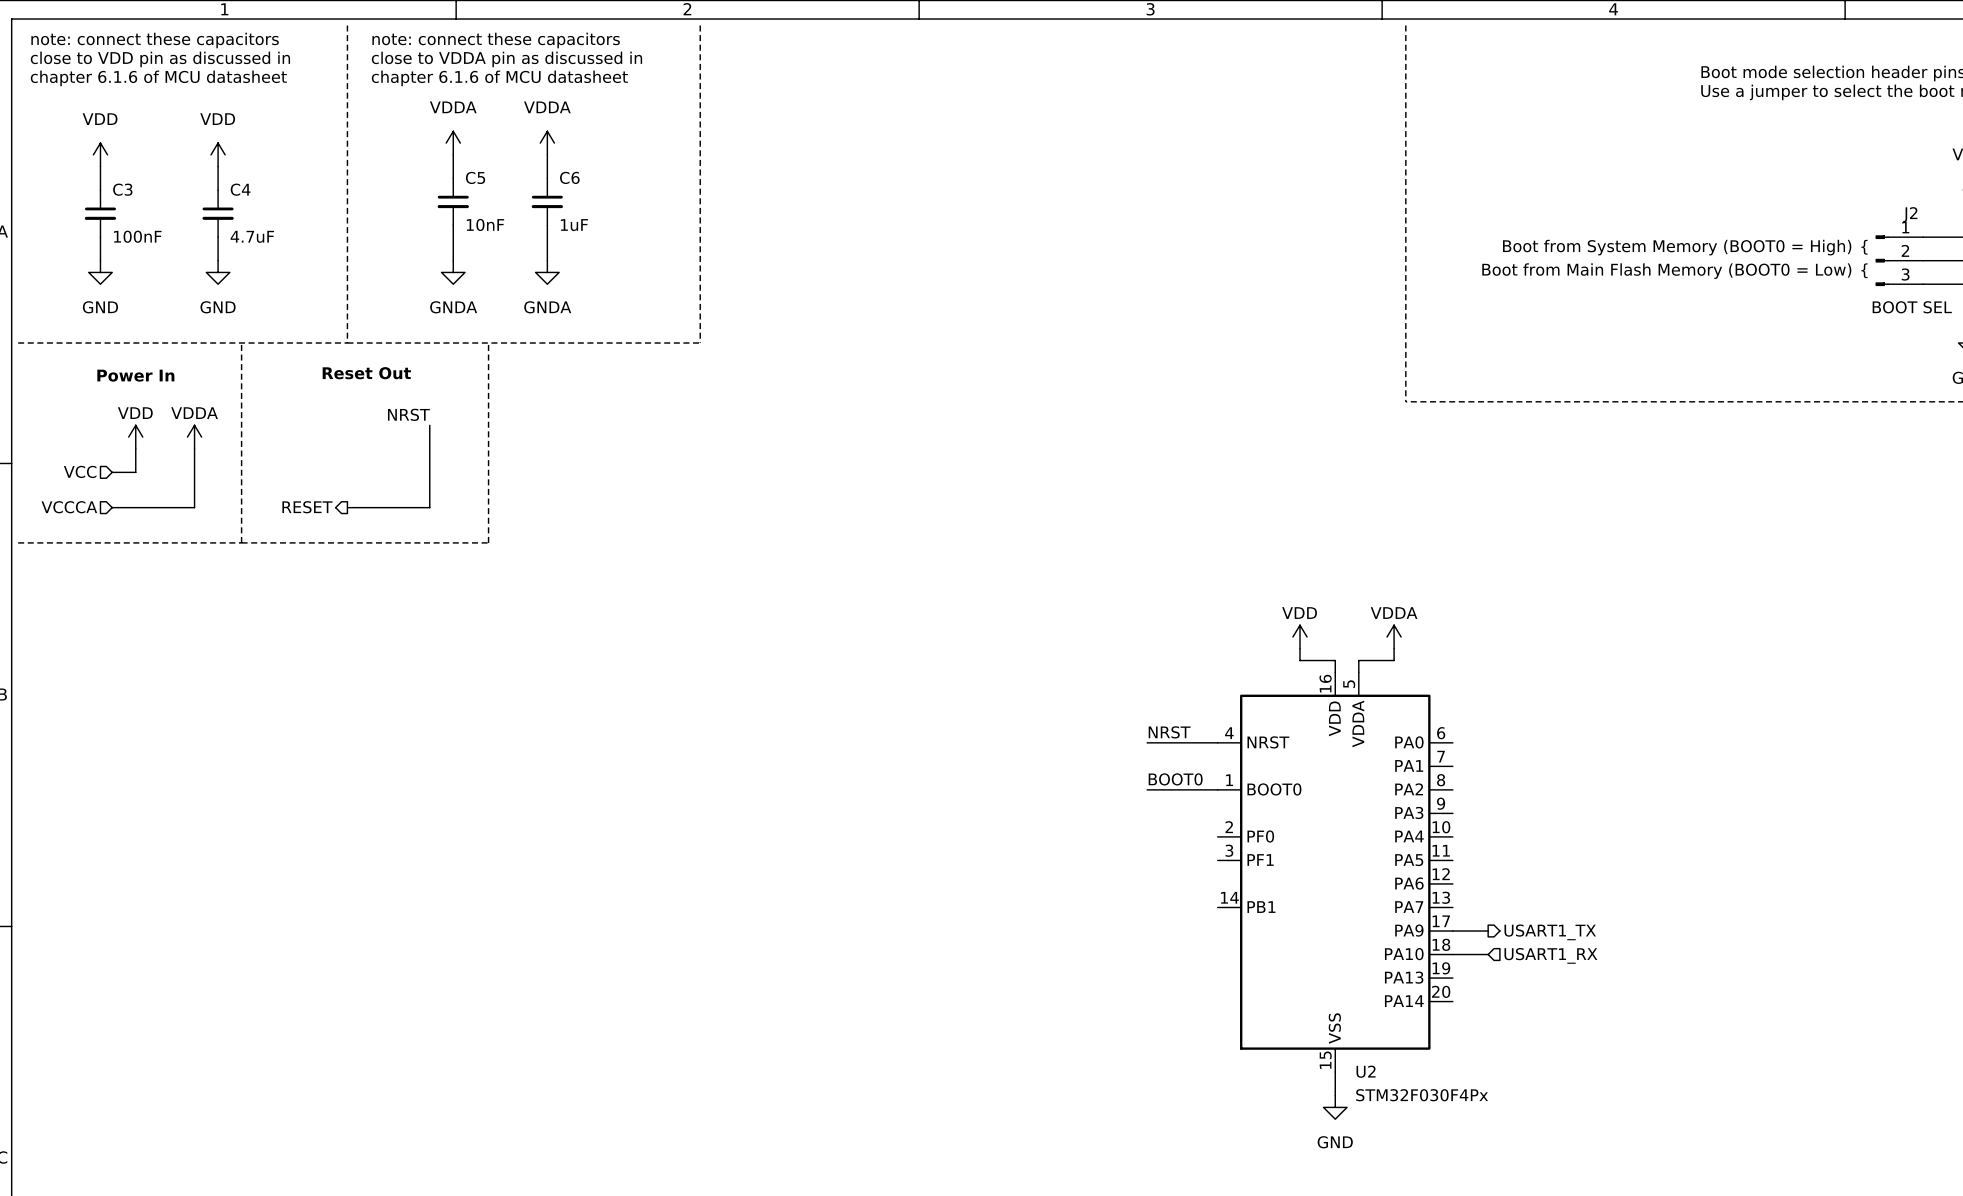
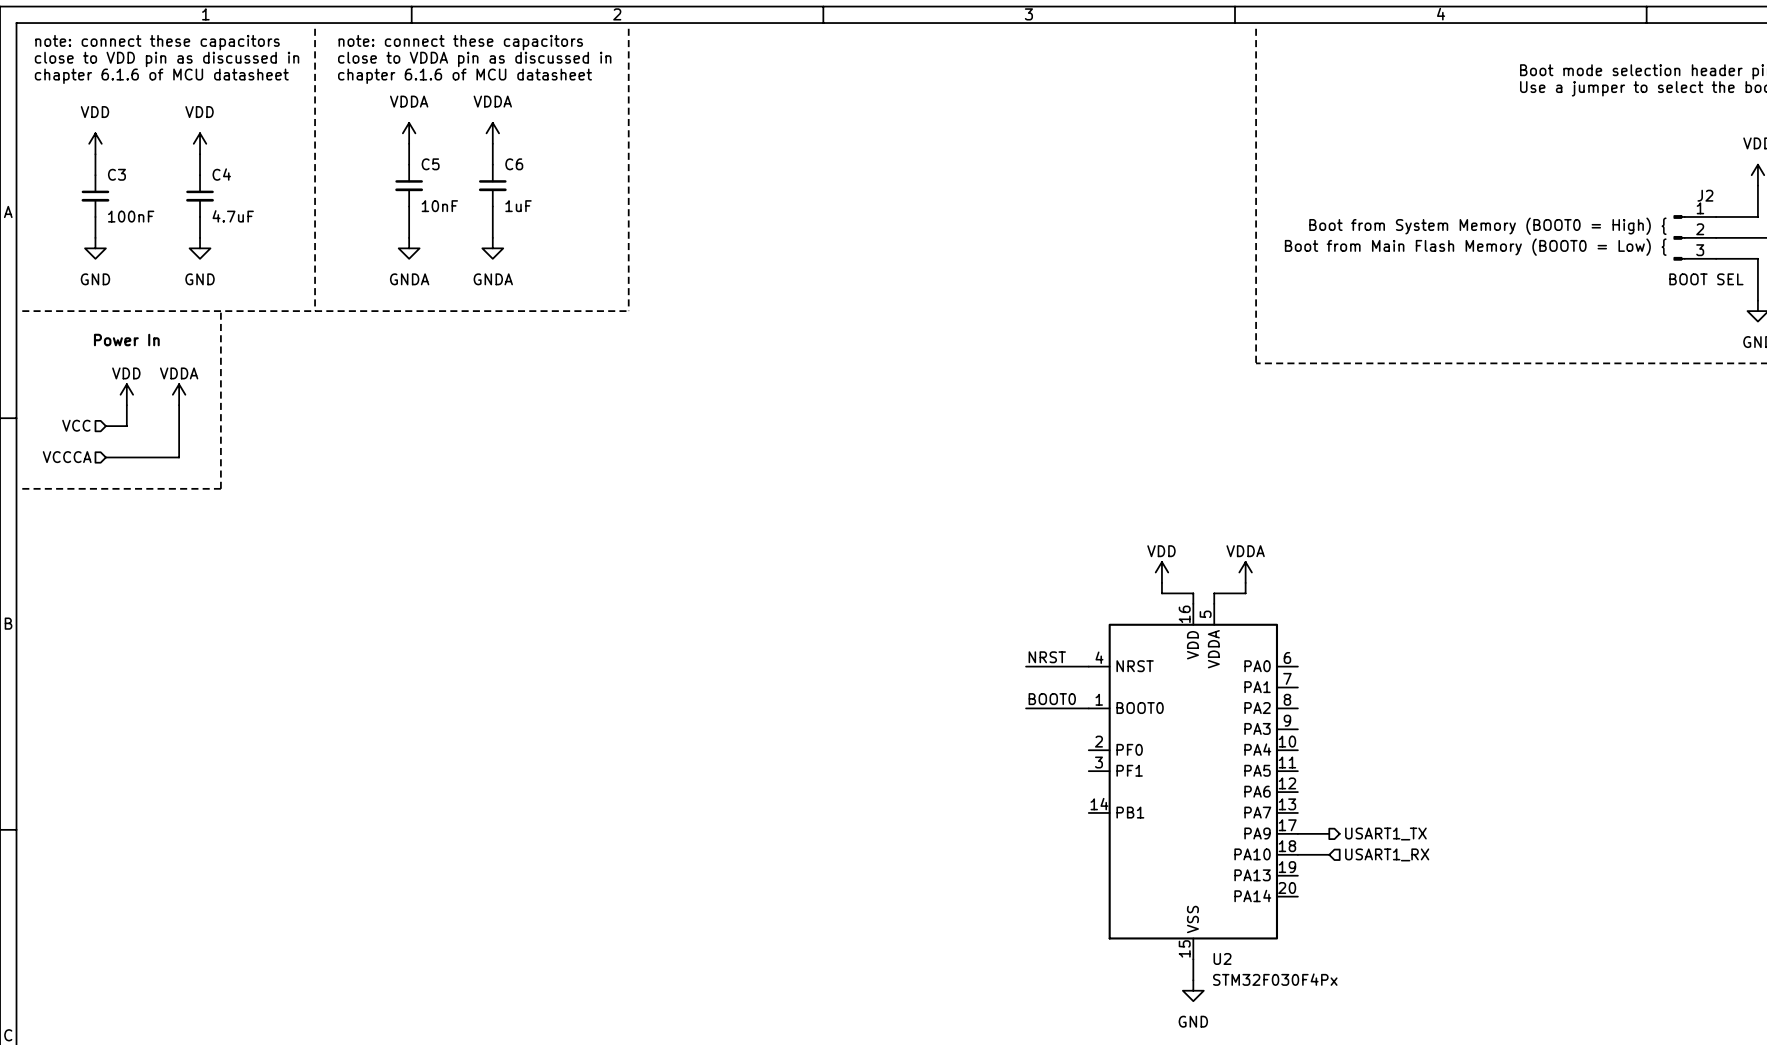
line: (488, 343) (488, 542) (241, 542) -> none
text: Reset Out (366, 373) -> none
label: NRST (408, 414) -> none
wire: (429, 425) (429, 507) (347, 507) -> none
hierarchical label: RESET (307, 507) -> none

